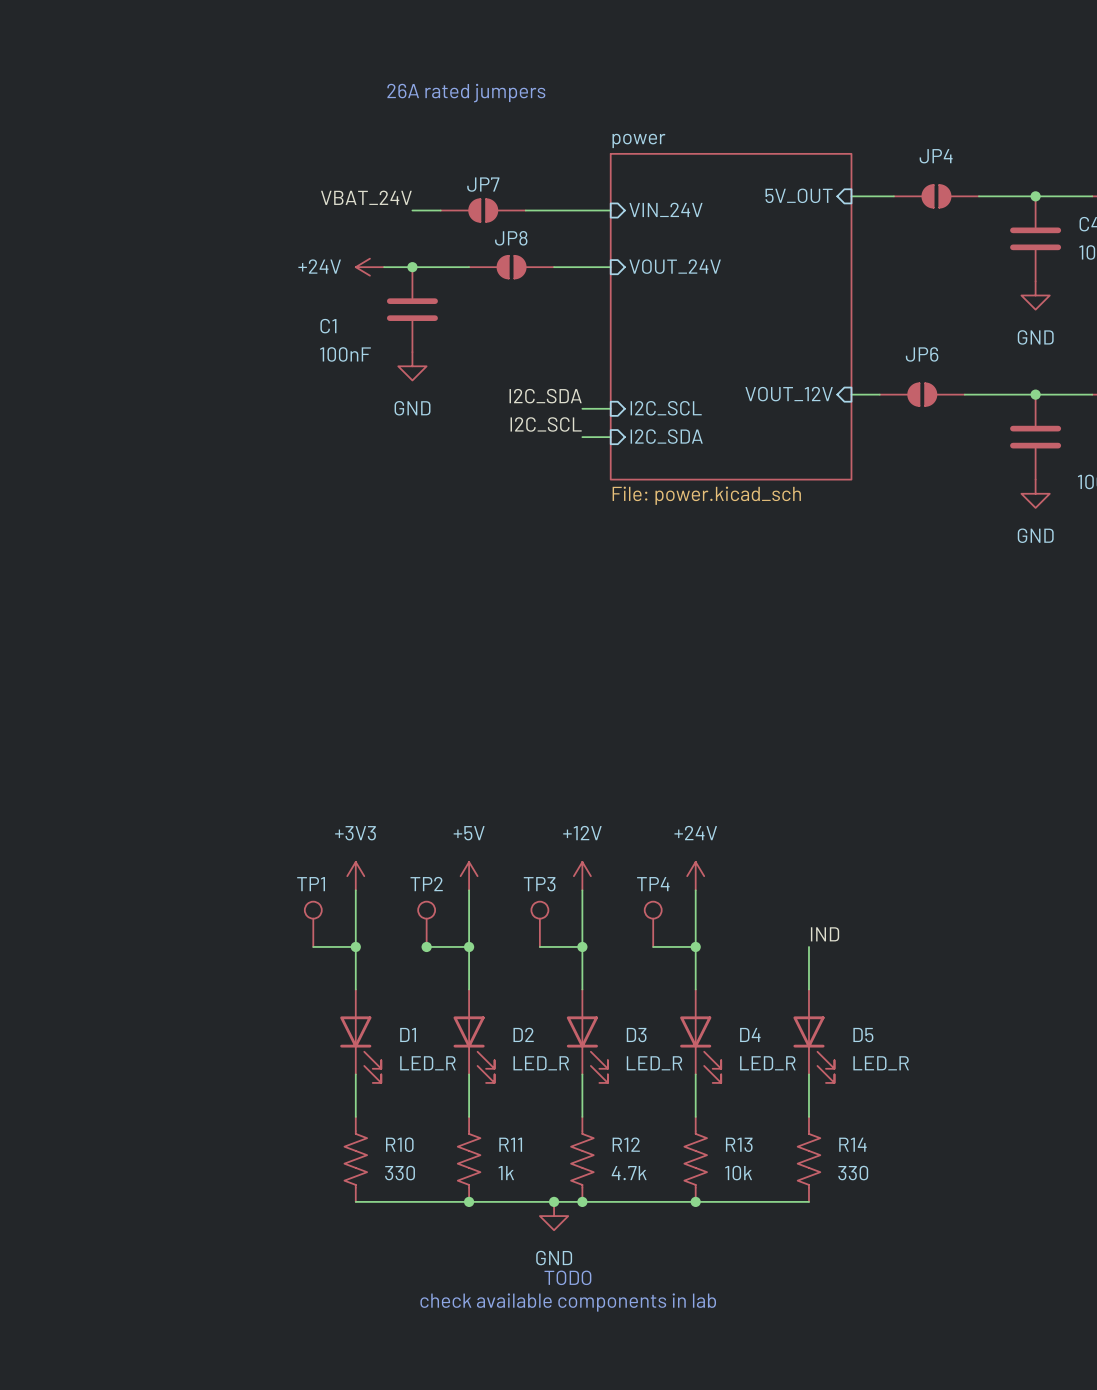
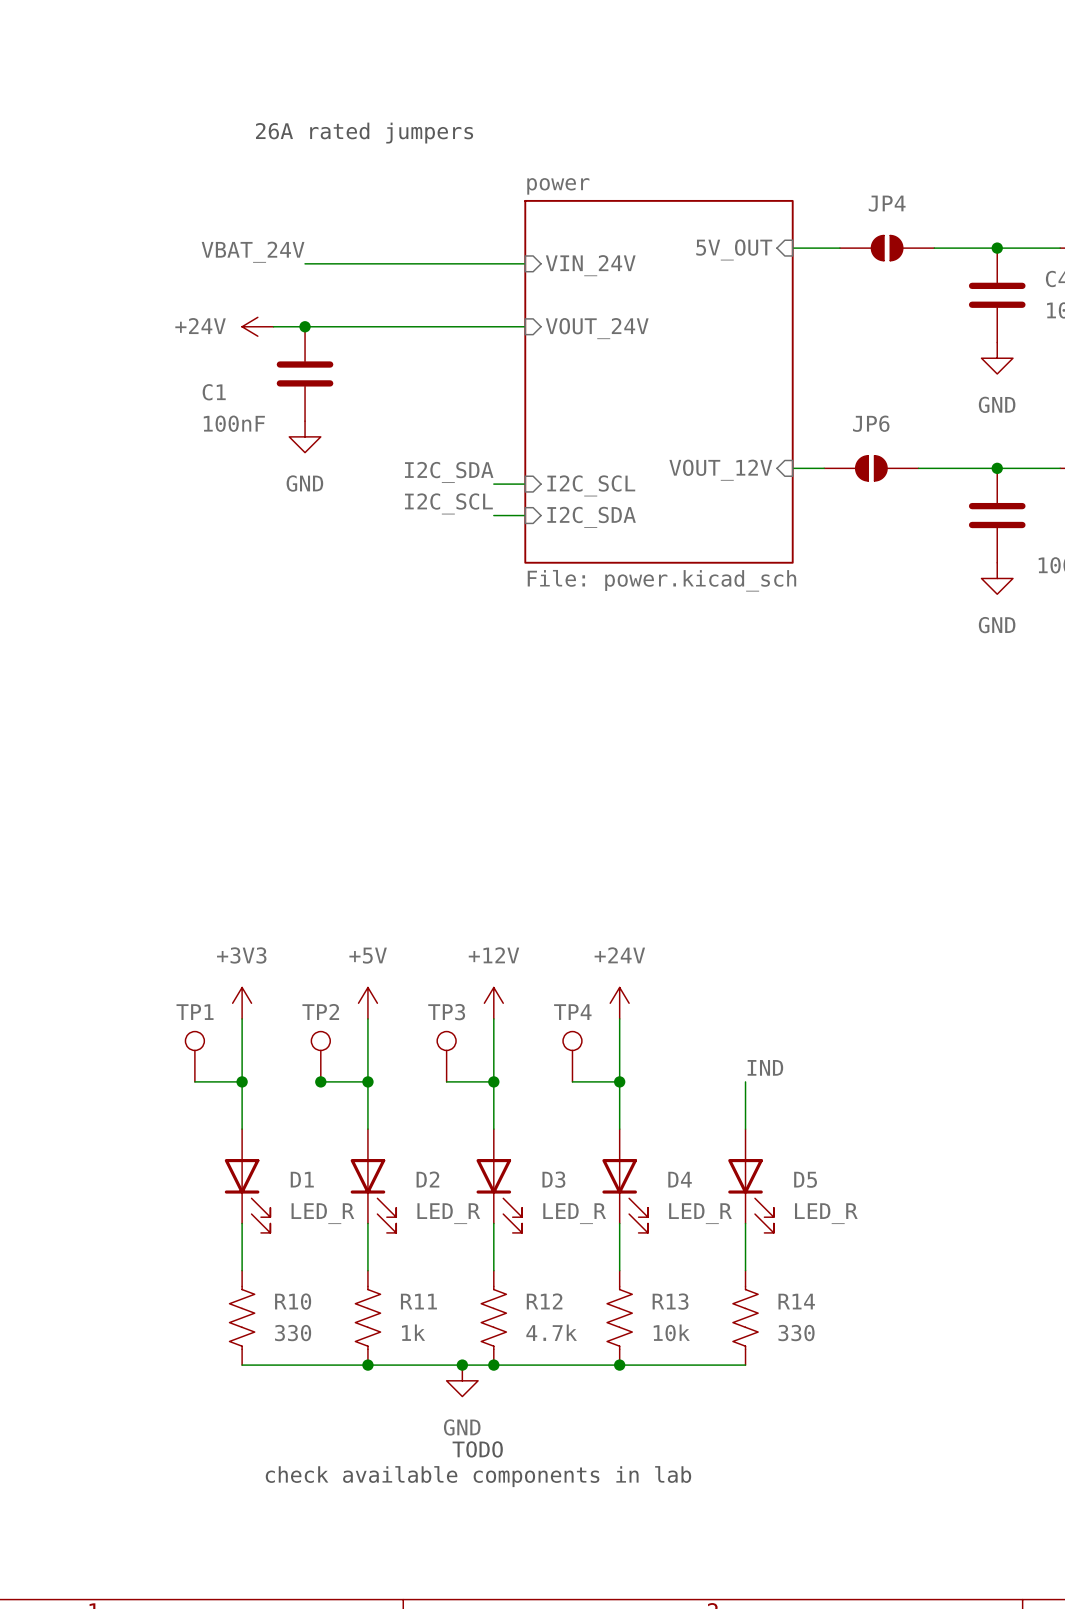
JP7: (483, 210) -> none
JP8: (511, 267) -> none

